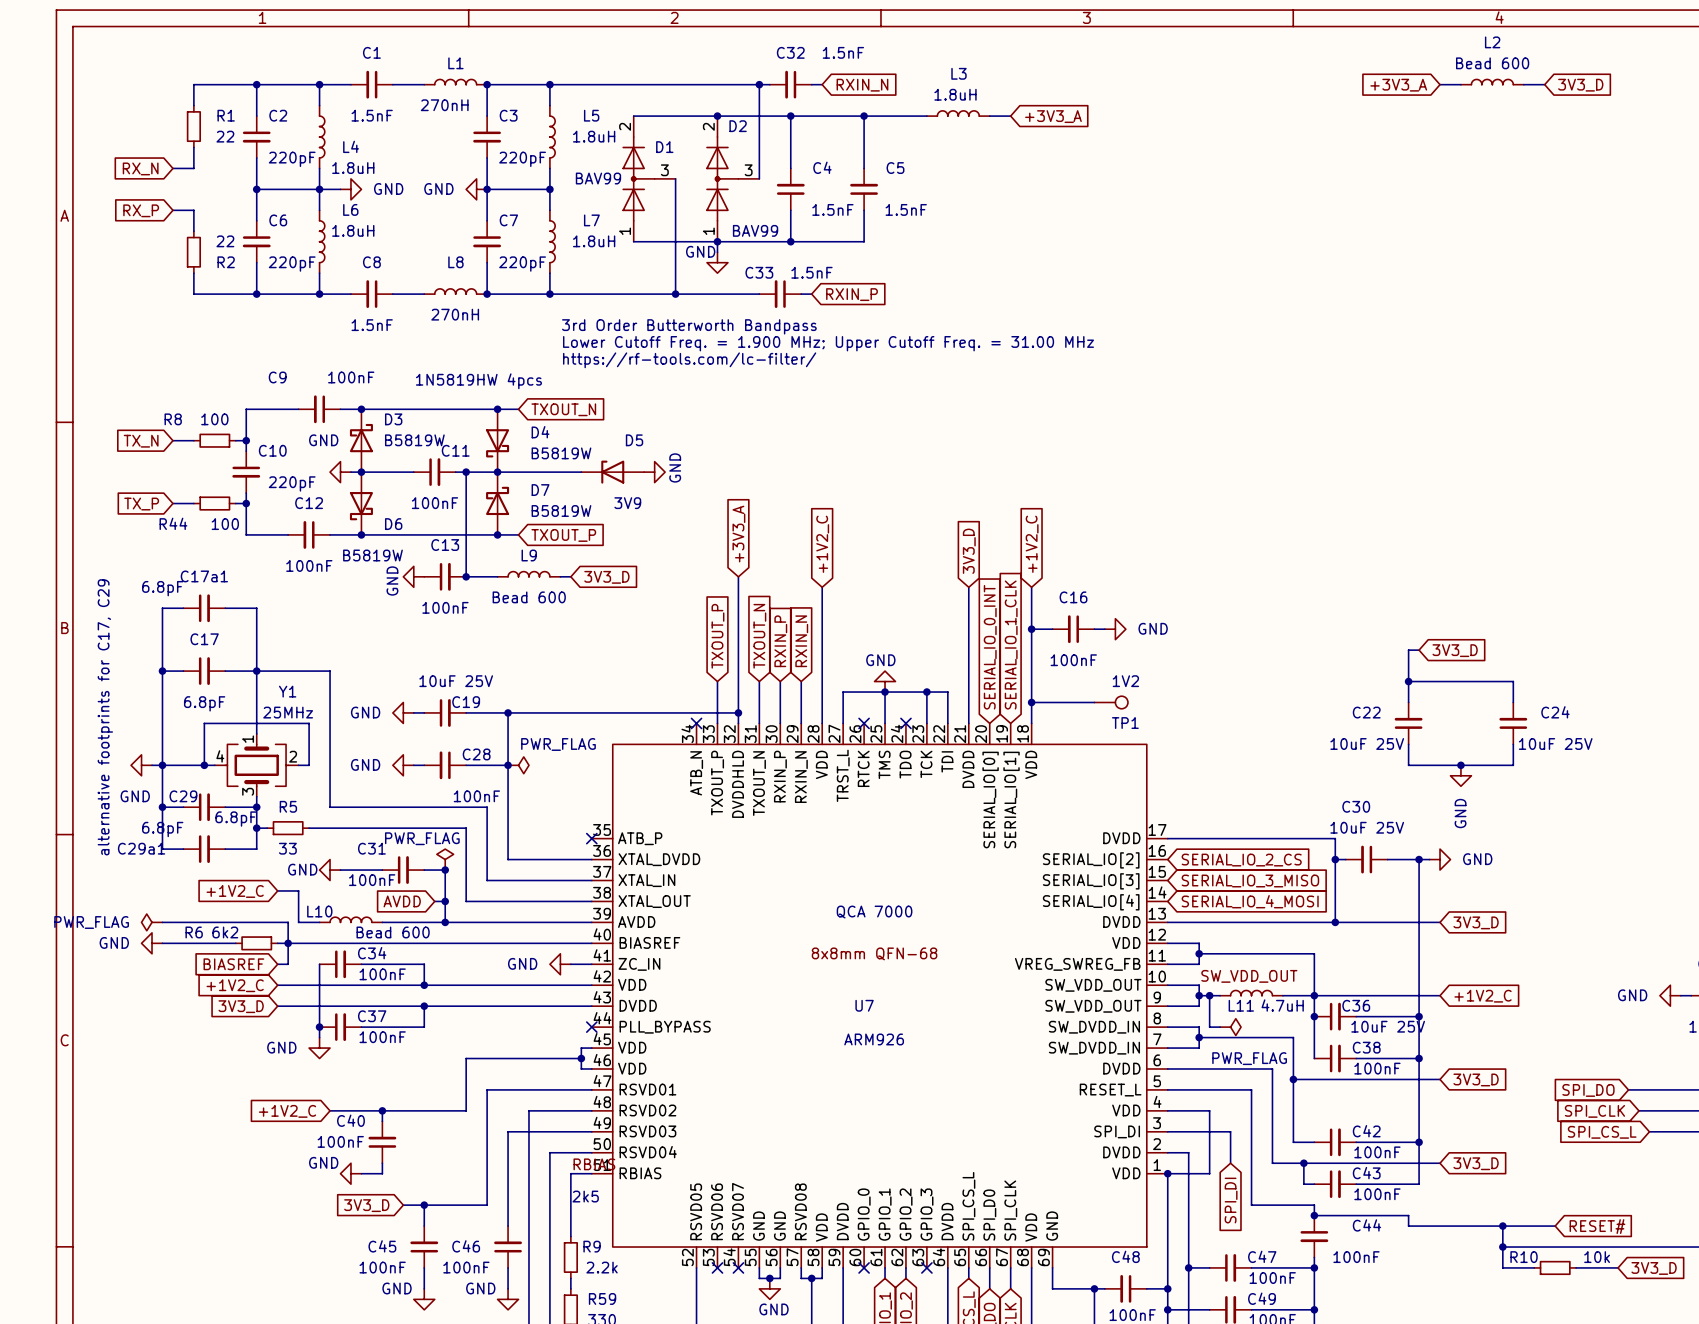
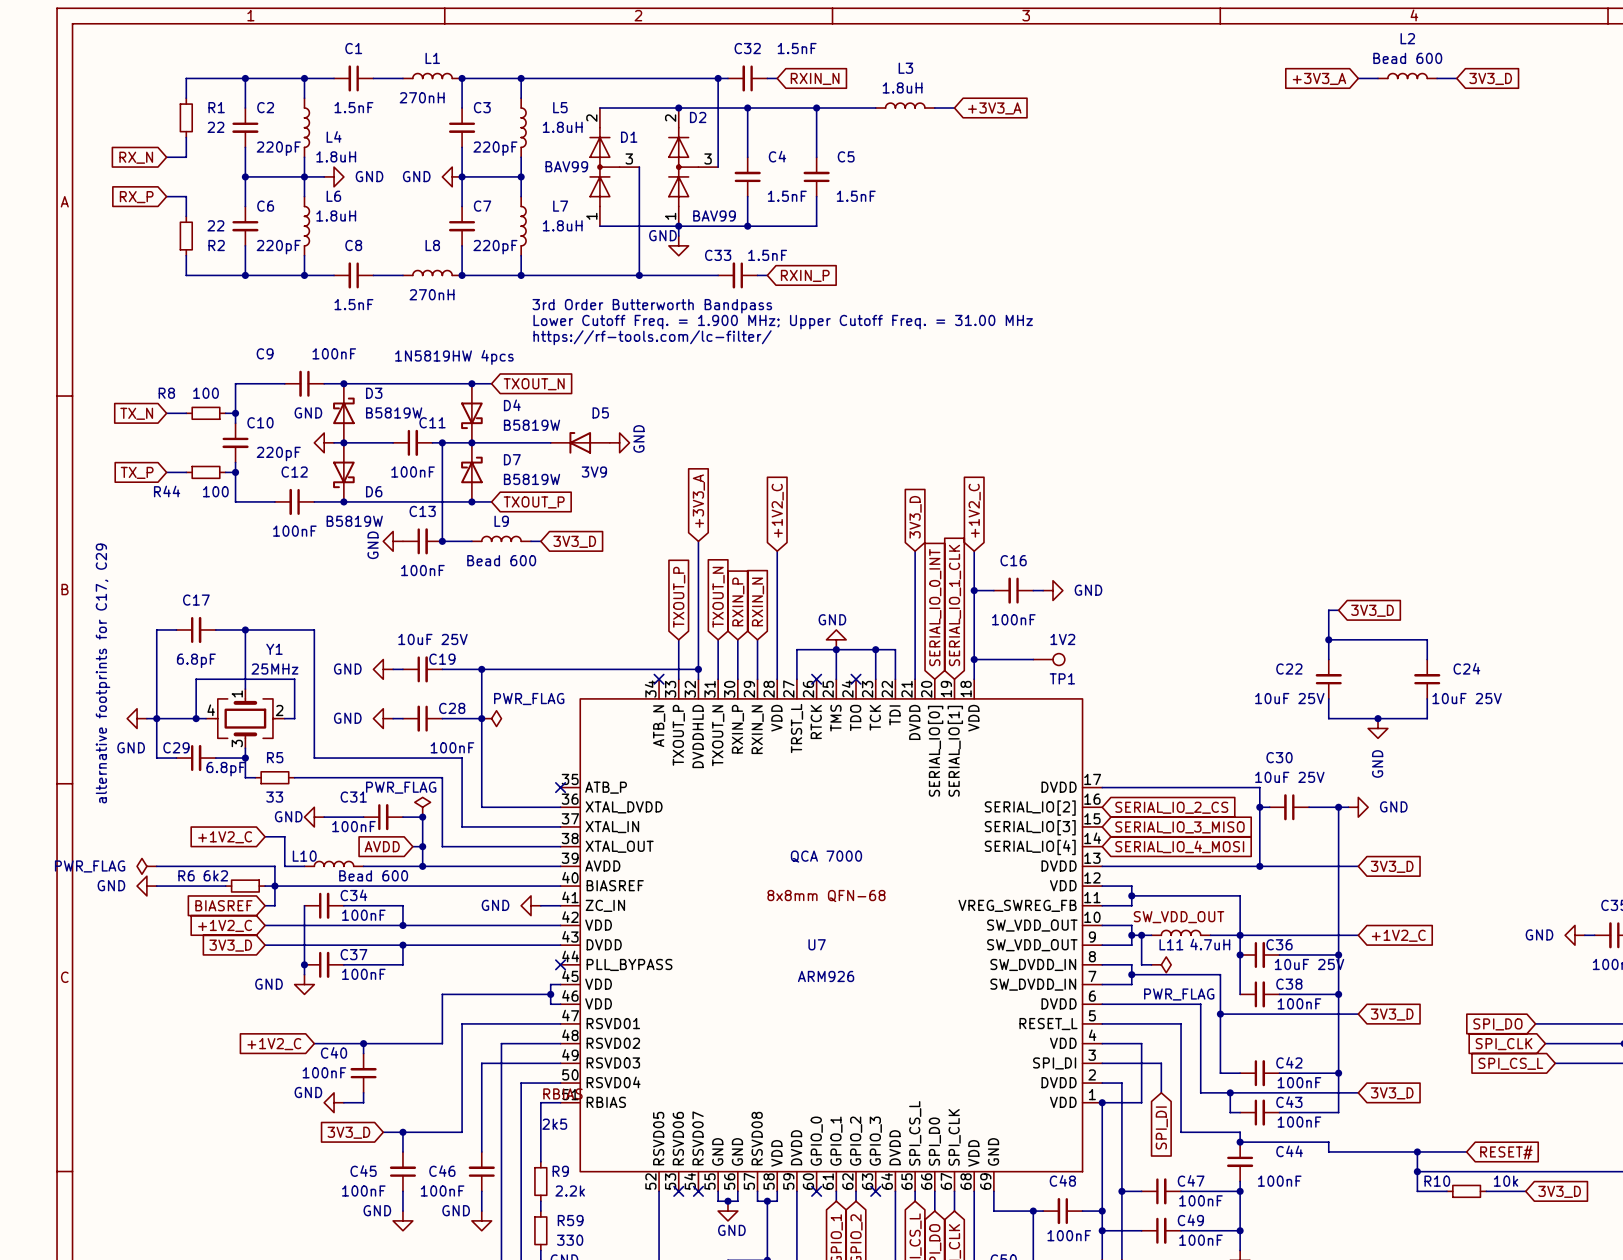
wire: (183, 608) (162, 608) (162, 671) -> none
C17a1: 6.8pF (204, 608) -> none
wire: (225, 608) (256, 608) (256, 671) -> none
junction: (162, 671) -> none
wire: (162, 807) (162, 849) (183, 849) -> none
junction: (162, 807) -> none
wire: (256, 828) (256, 849) (225, 849) -> none
junction: (256, 828) -> none
C29a1: 6.8pF (204, 849) -> none

